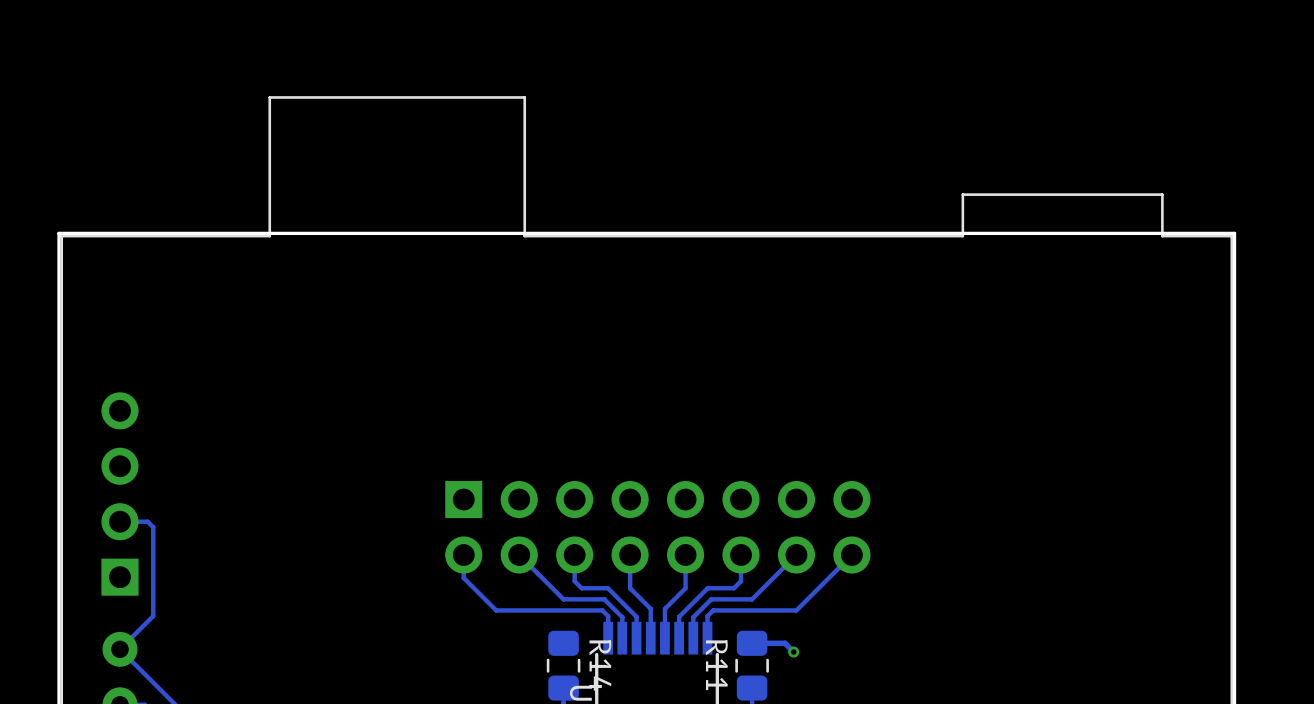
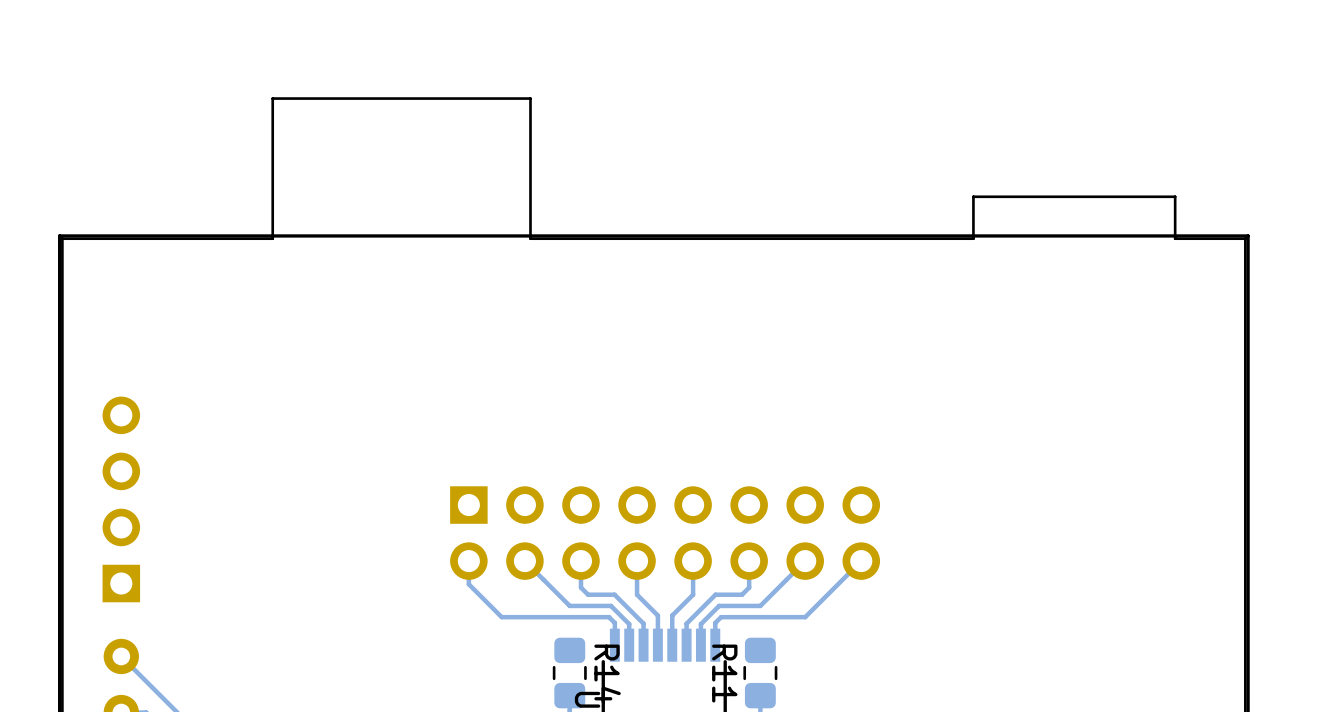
track: (119, 521) (147, 521) (153, 527) (153, 616) (119, 649) -> none
track: (752, 643) (784, 643) (793, 652) -> none
via: (793, 652) -> none

